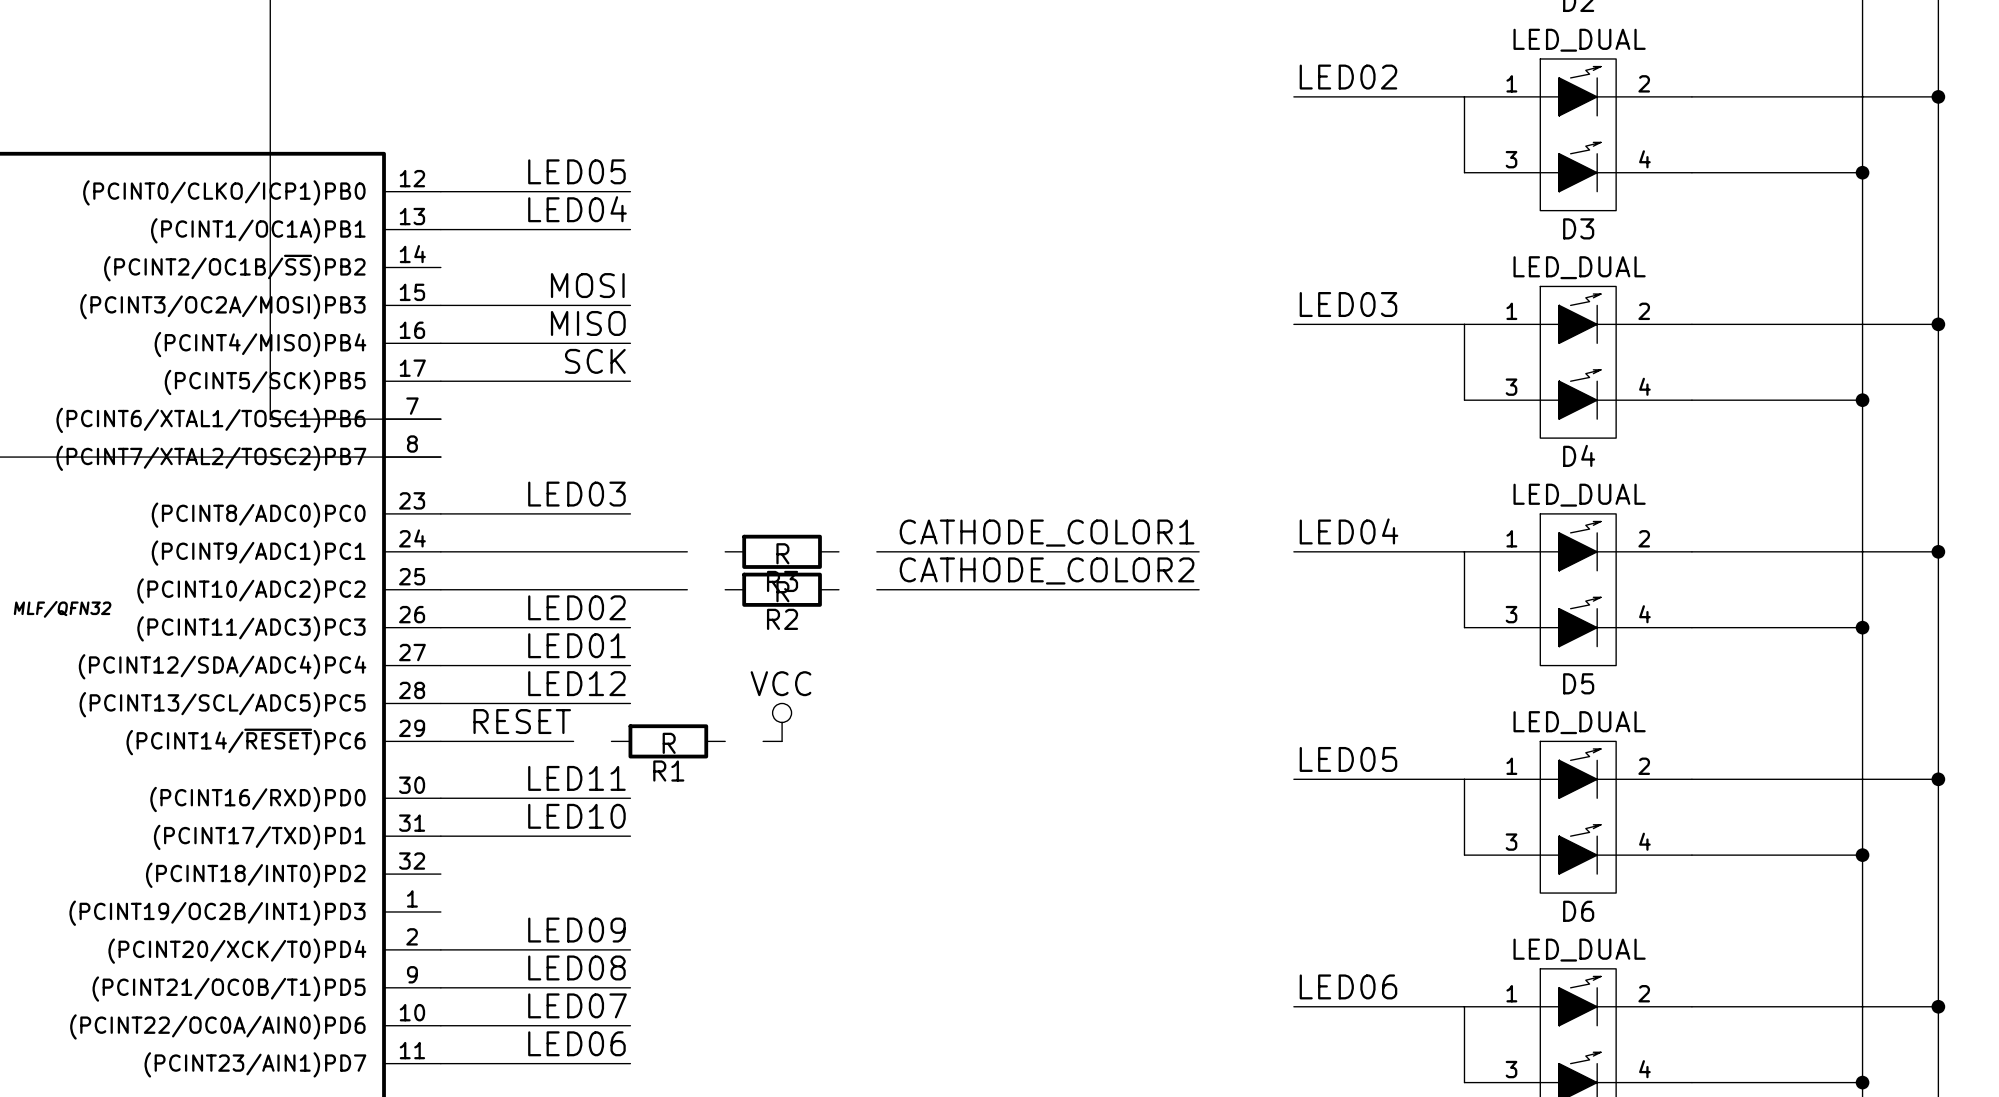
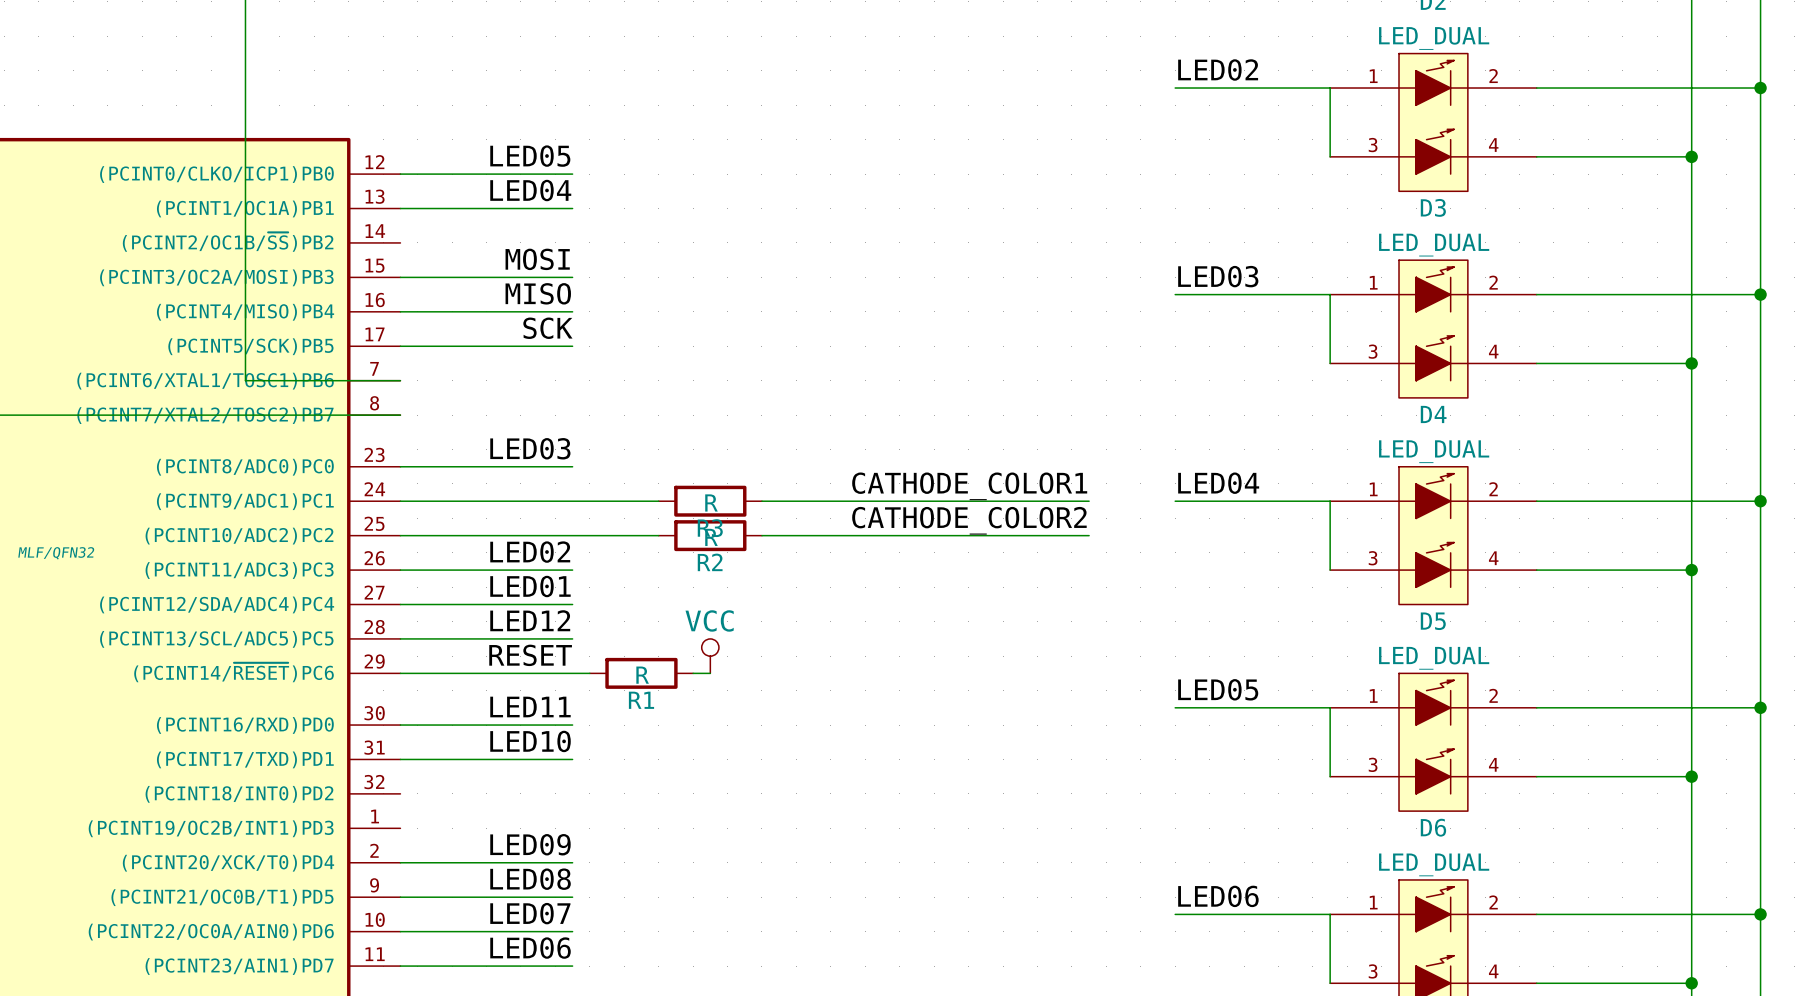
wire: none -> (624, 501) (658, 501)
wire: none -> (761, 501) (796, 501)
wire: none -> (624, 535) (658, 535)
wire: none -> (761, 535) (796, 535)
label position: RESET (522, 721) -> RESET (530, 655)
wire: none -> (520, 673) (589, 673)
R1 position: (668, 741) -> (641, 673)

